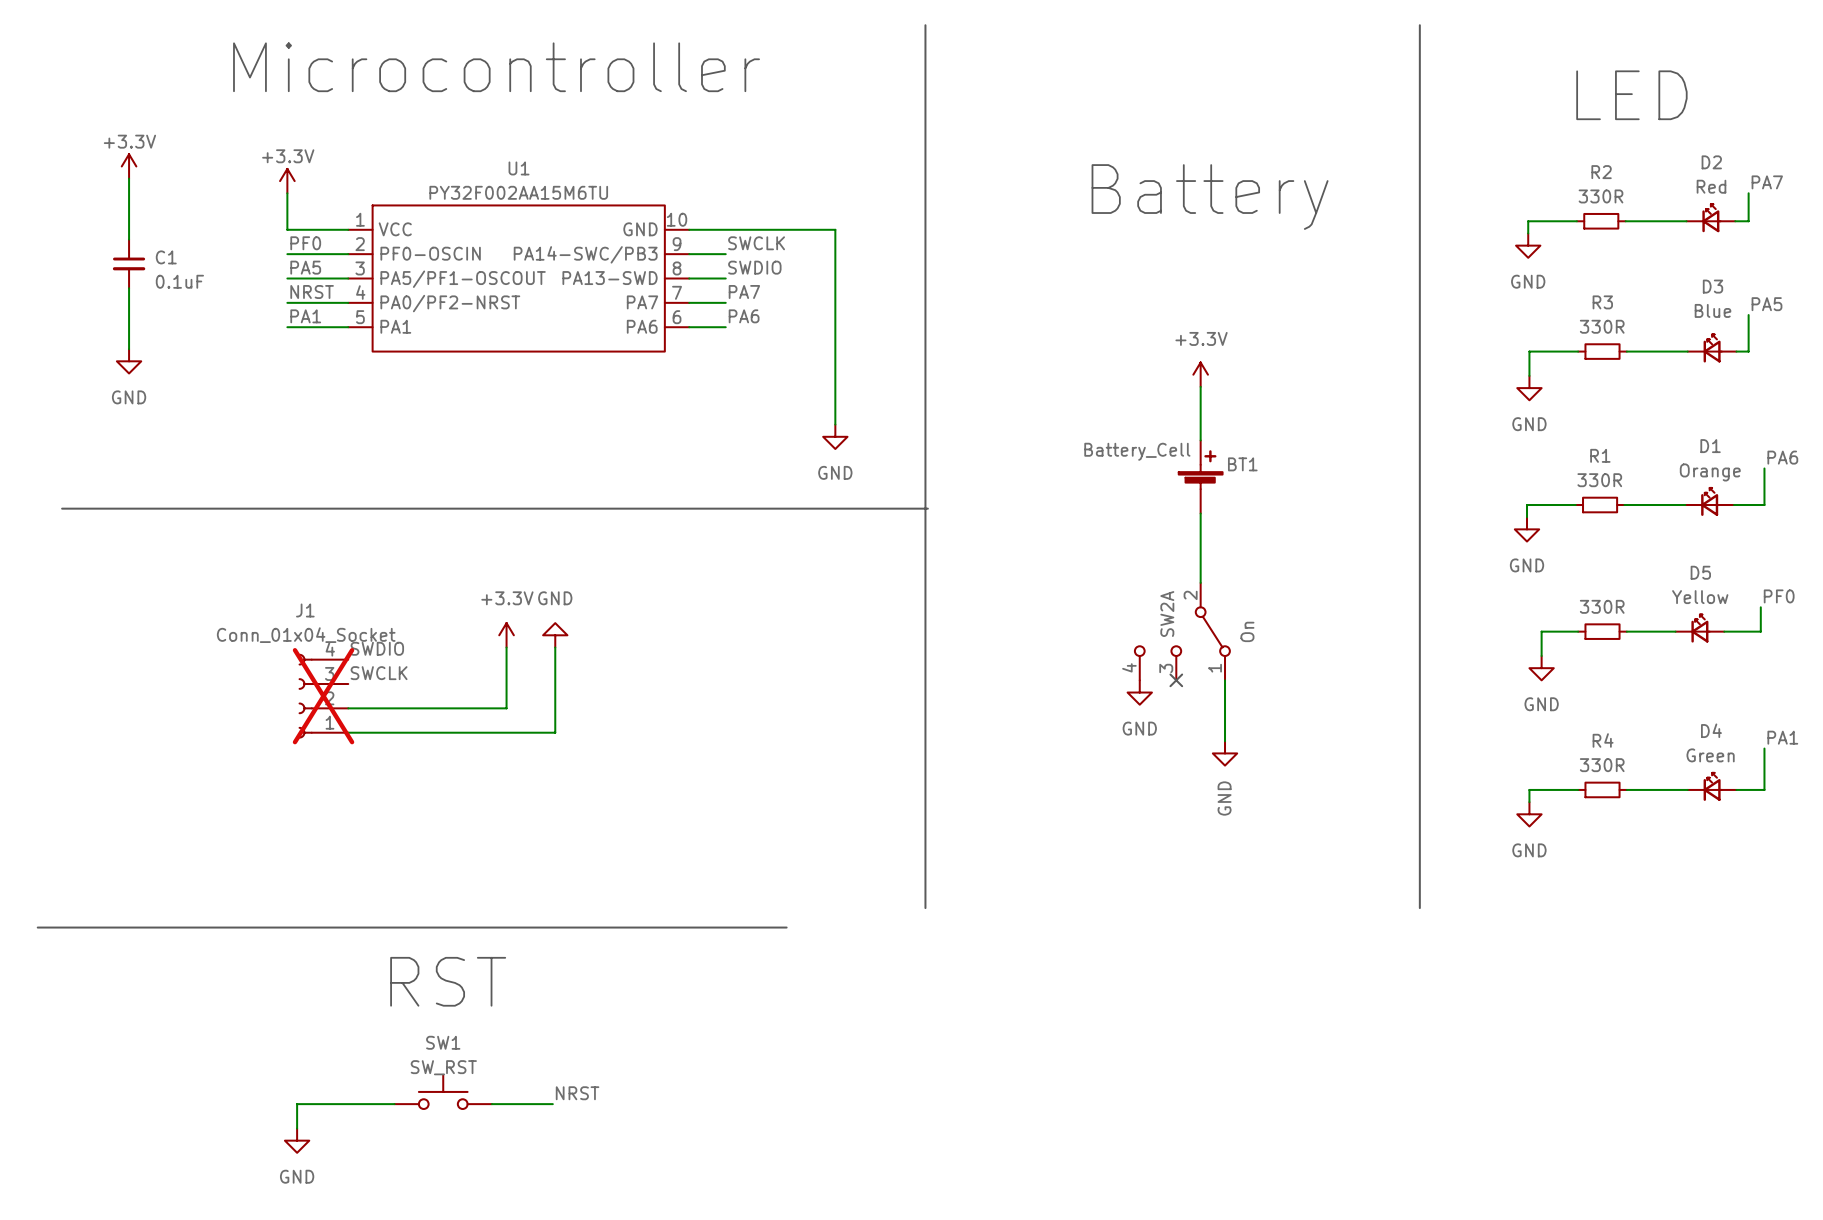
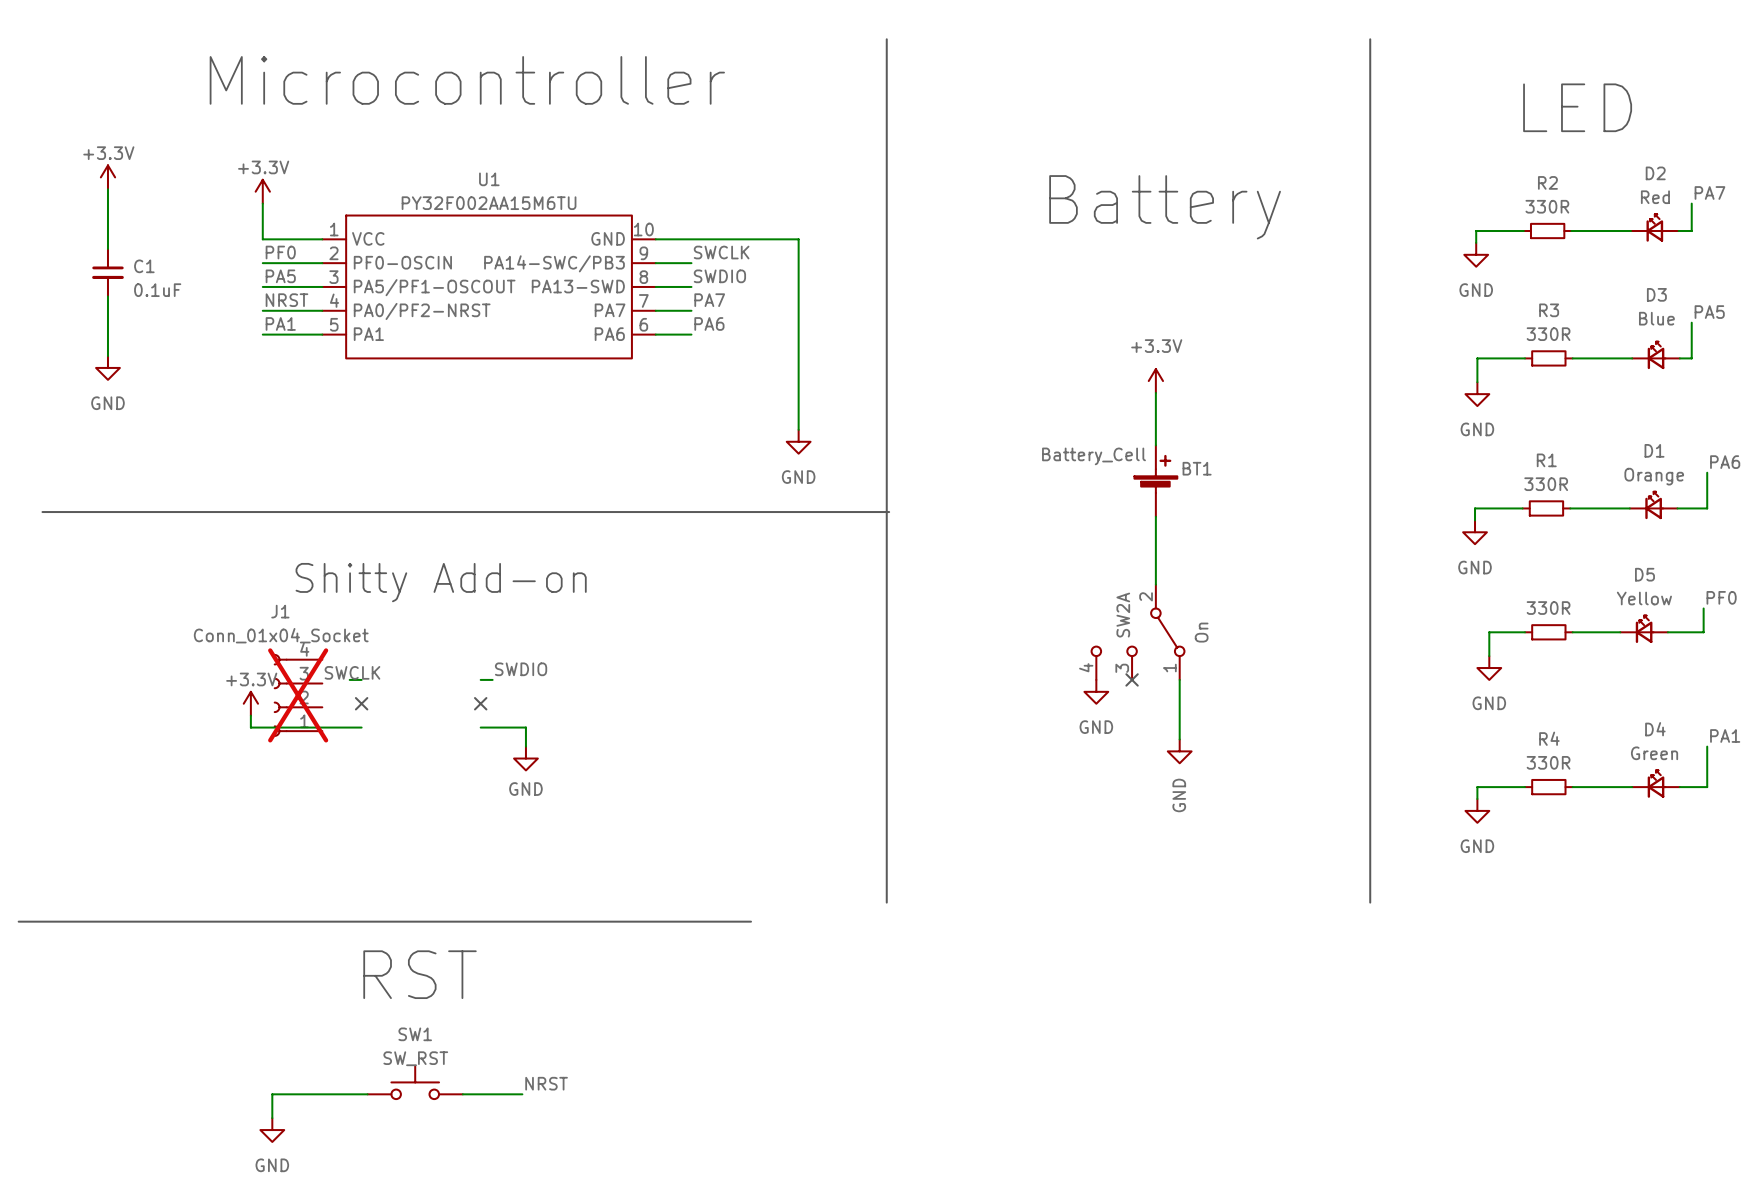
text: none -> Shitty Add-on (441, 582)
power symbol: +3.3V (506, 635) -> none
power symbol rotation: 0° (555, 635) -> 180° (525, 758)
power symbol position: GND (555, 635) -> GND (525, 758)
wire: (506, 647) (506, 708) (348, 708) -> none
wire: (555, 647) (555, 732) (348, 732) -> none
label position: SWDIO (377, 648) -> SWDIO (521, 669)
wire: none -> (349, 679) (361, 679)
wire: none -> (480, 679) (492, 679)
power symbol: none -> +3.3V (250, 703)
no-connect mark: none -> (361, 703)
no-connect mark: none -> (480, 703)
wire: none -> (250, 715) (250, 727) (361, 727)
wire: none -> (480, 727) (525, 727) (525, 746)

